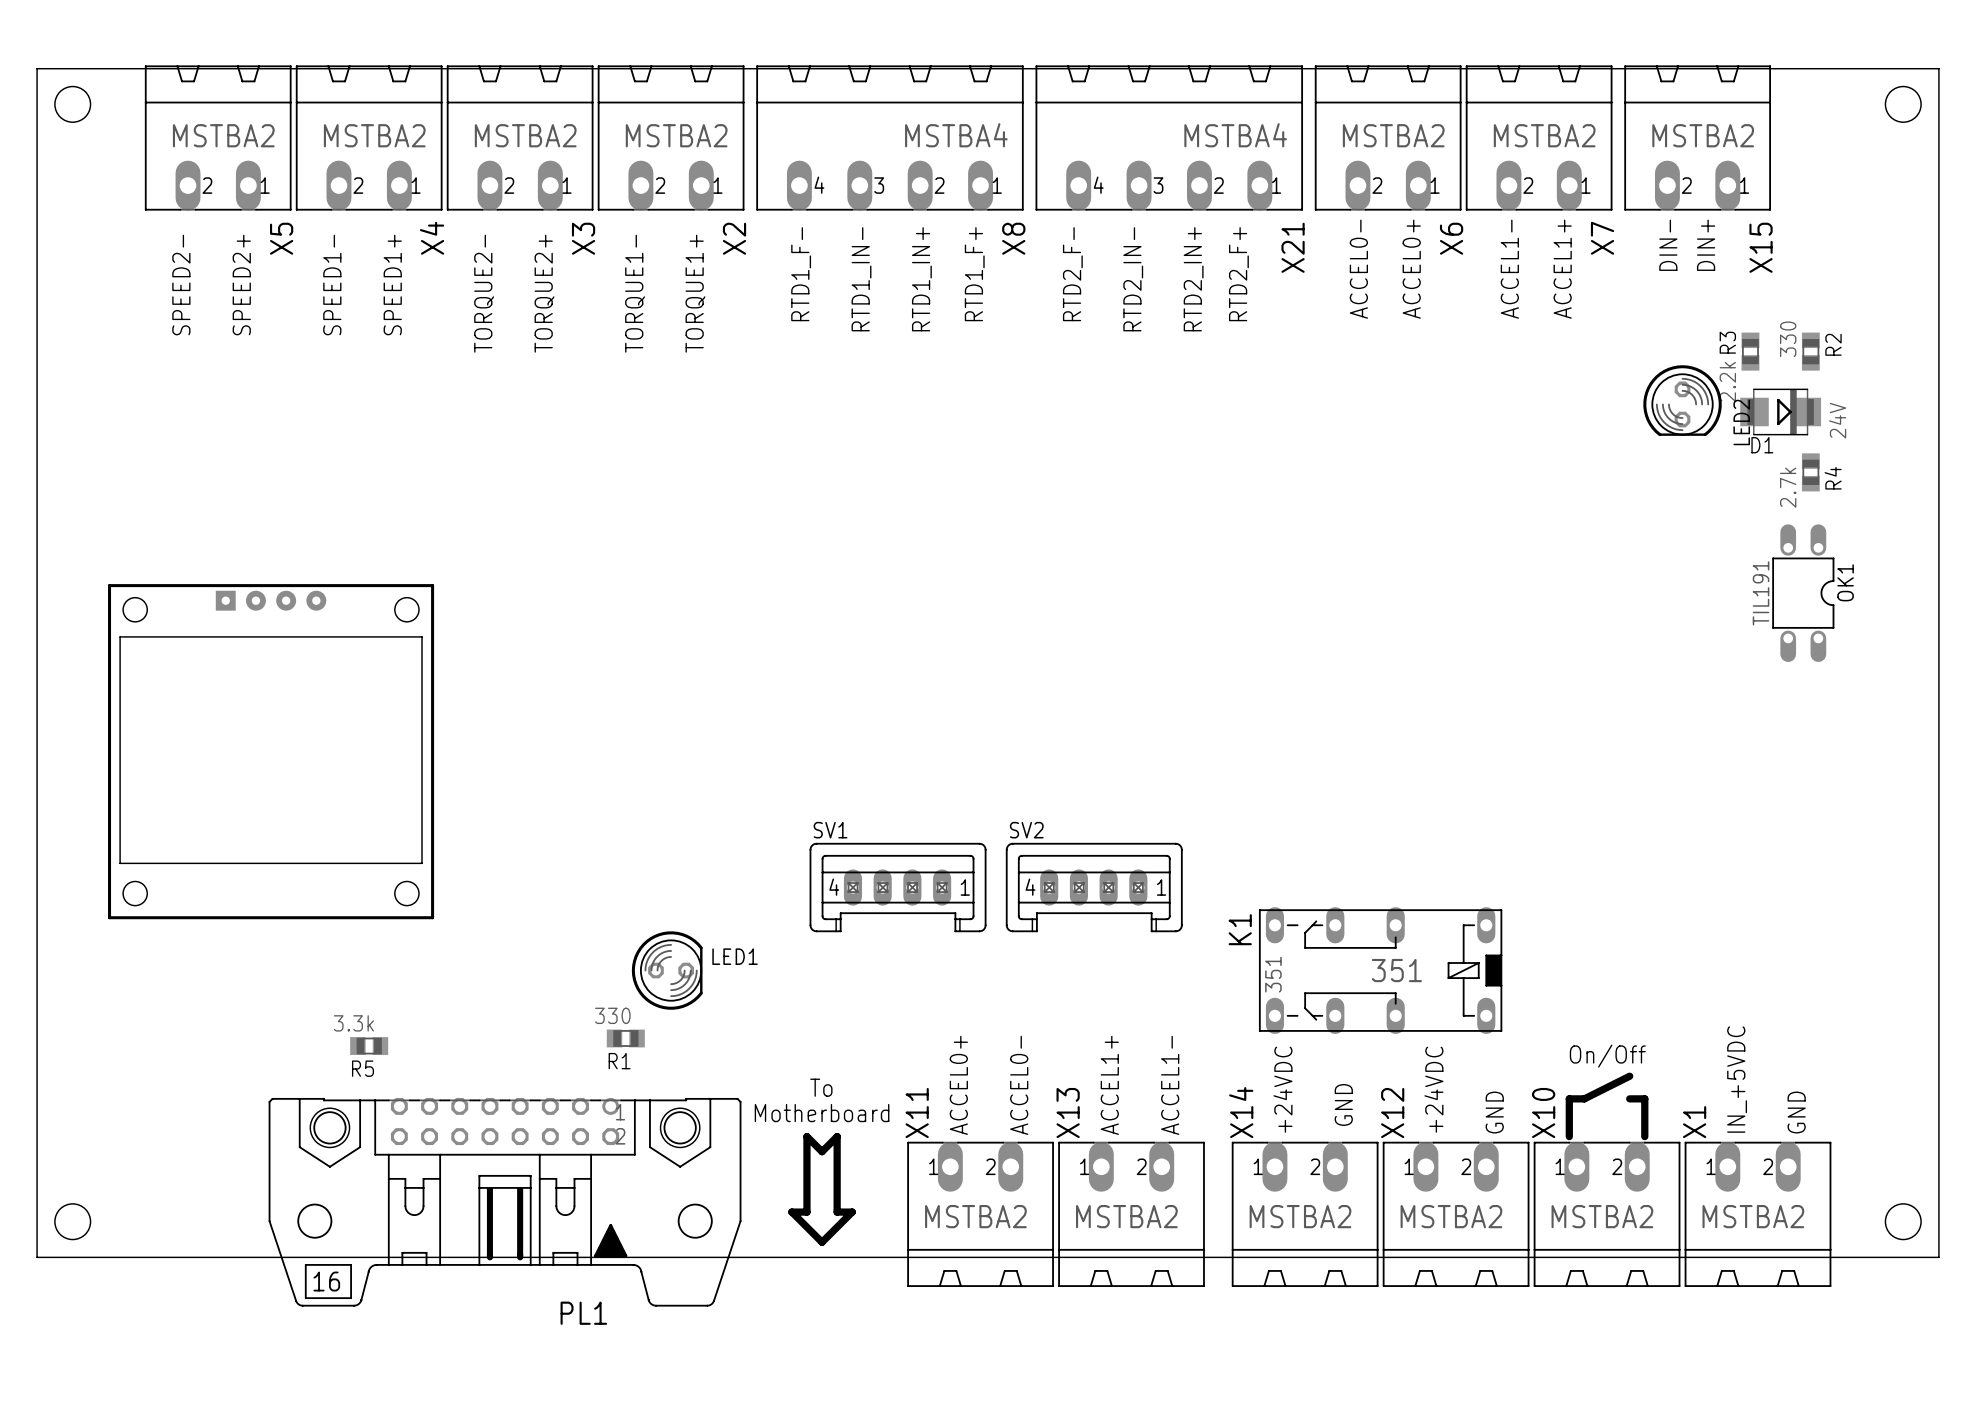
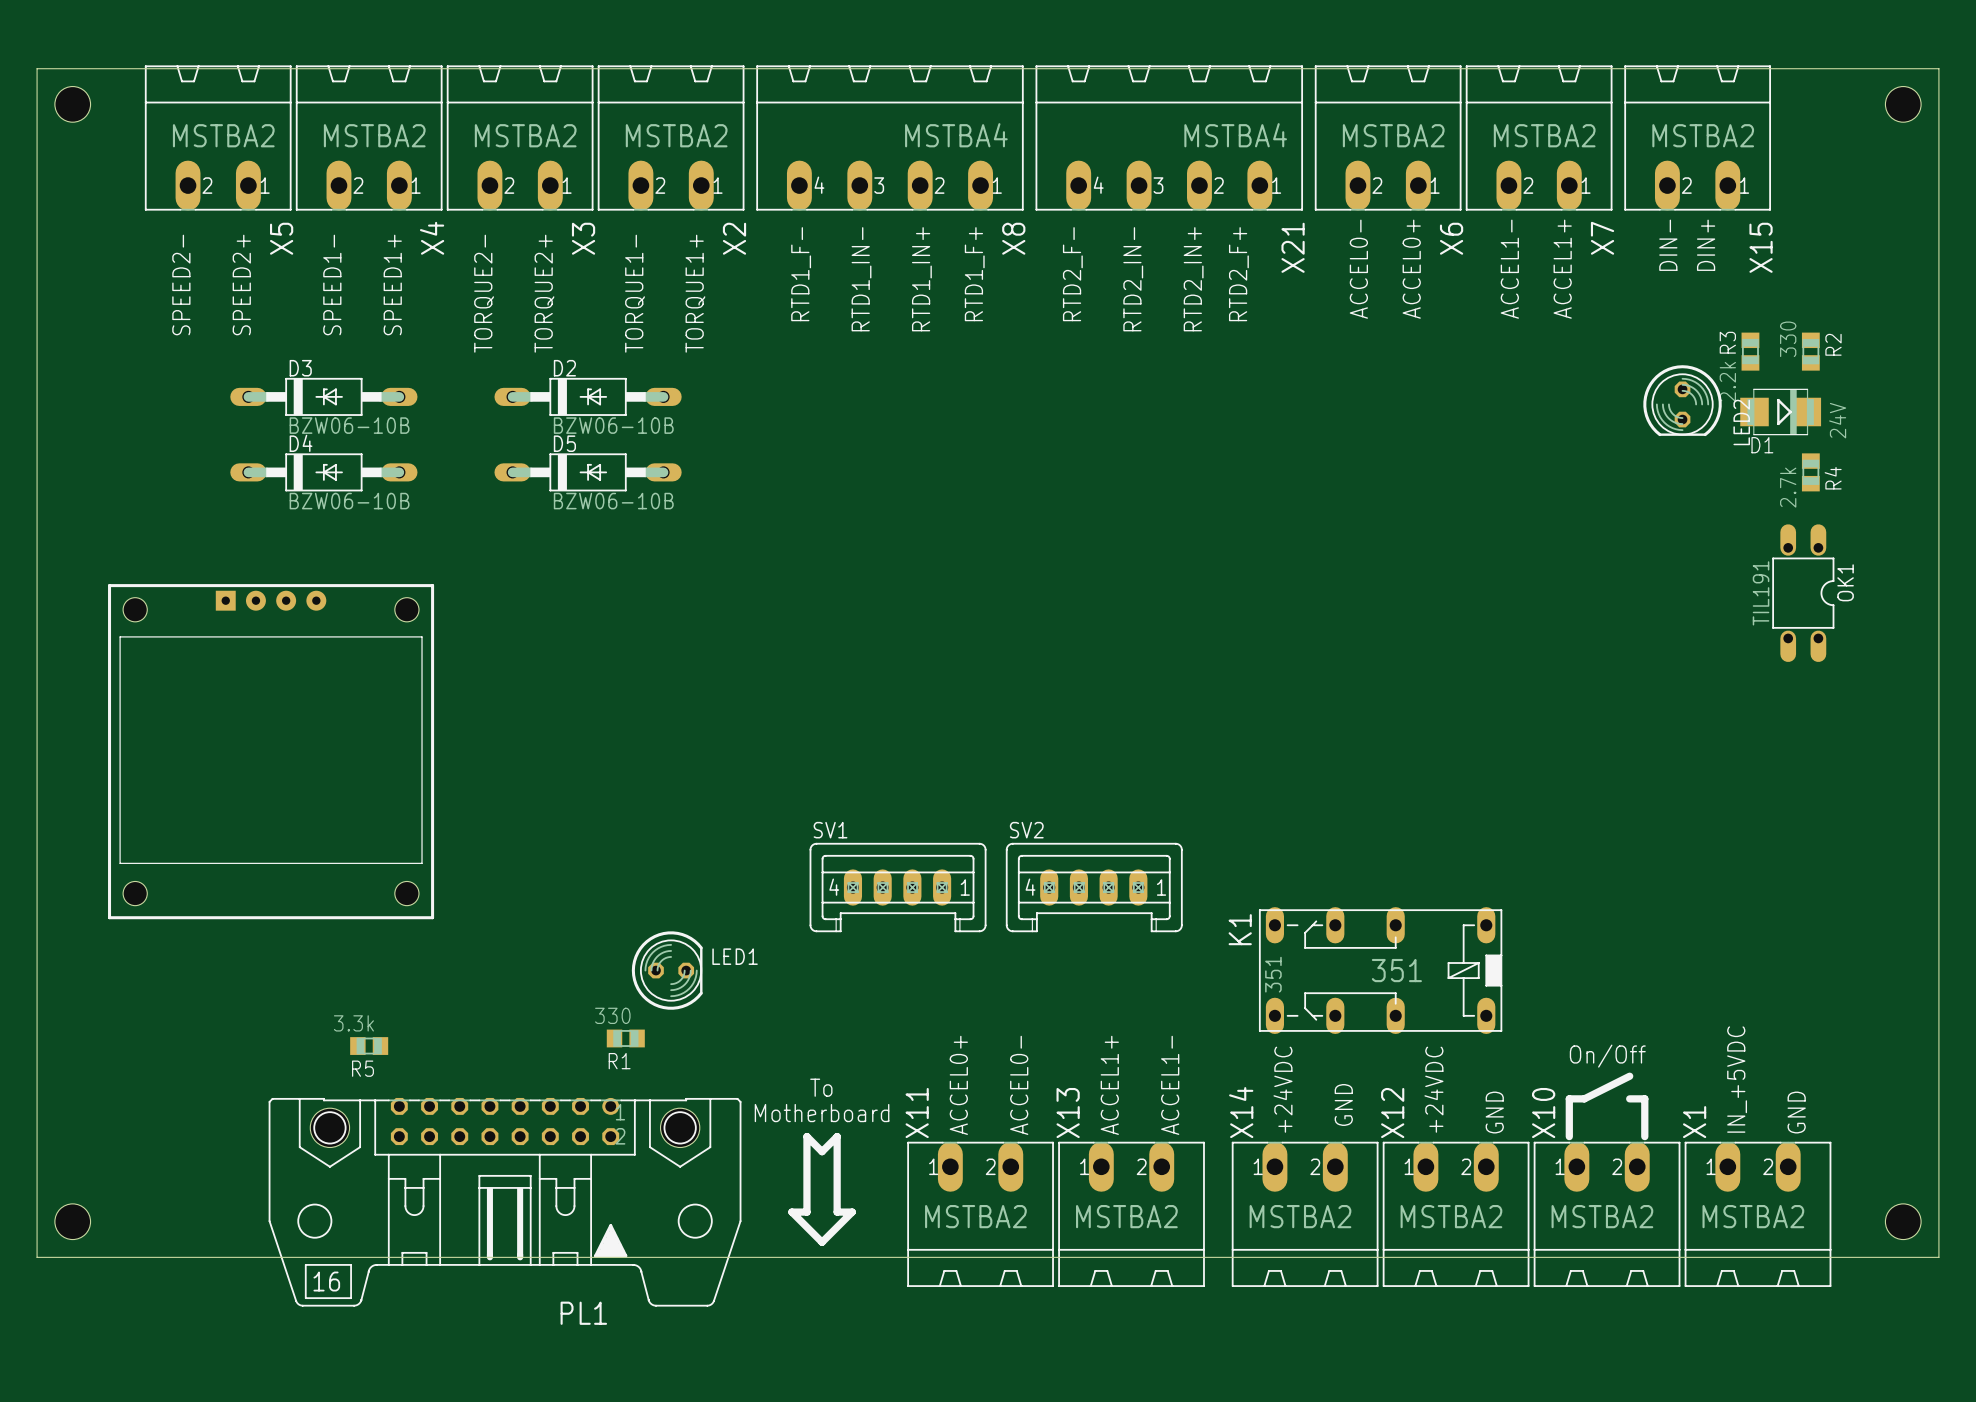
D3: none -> BZW06-10B (323, 396)
D2: none -> BZW06-10B (588, 396)
D4: none -> BZW06-10B (323, 472)
D5: none -> BZW06-10B (588, 472)

